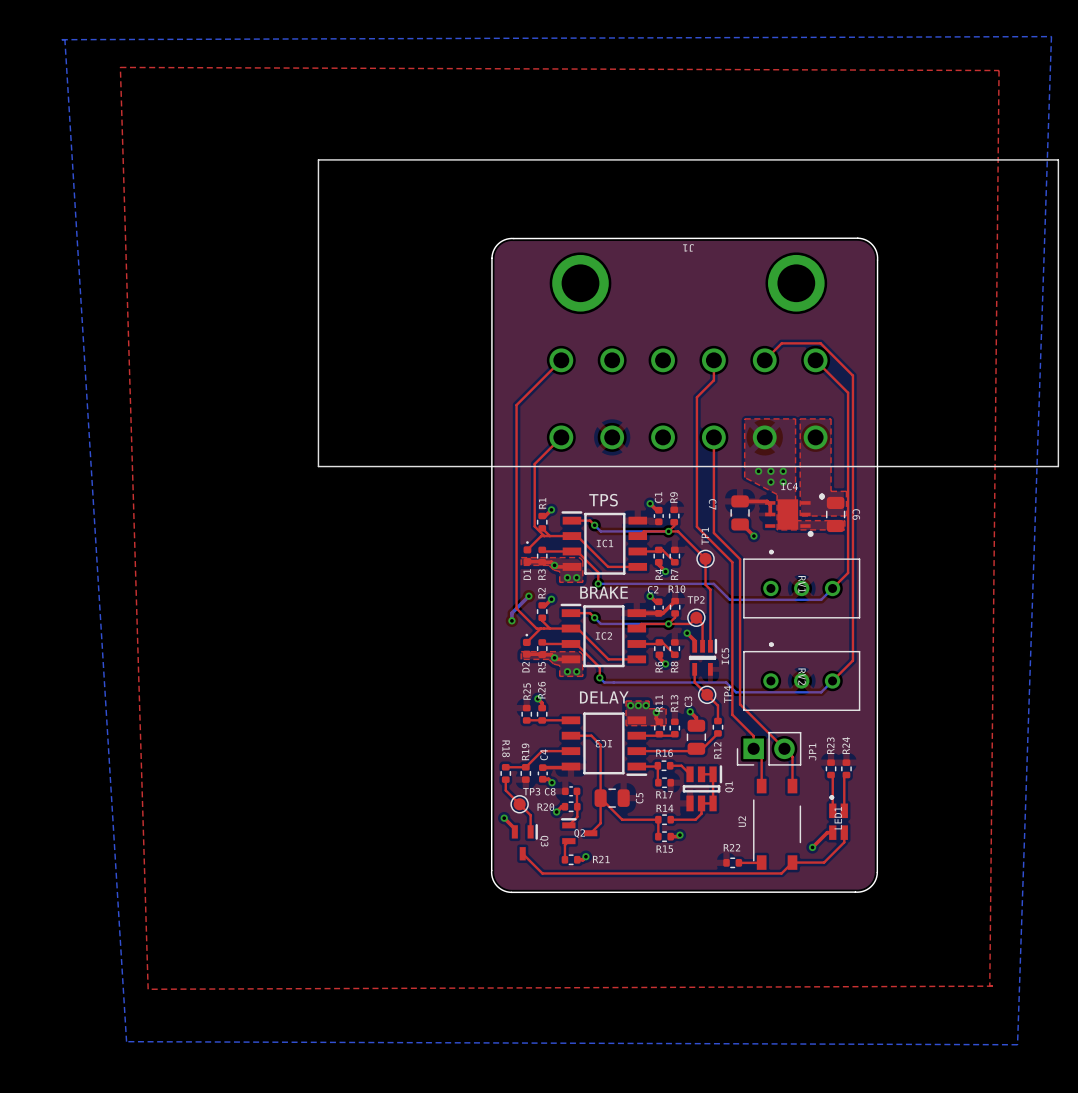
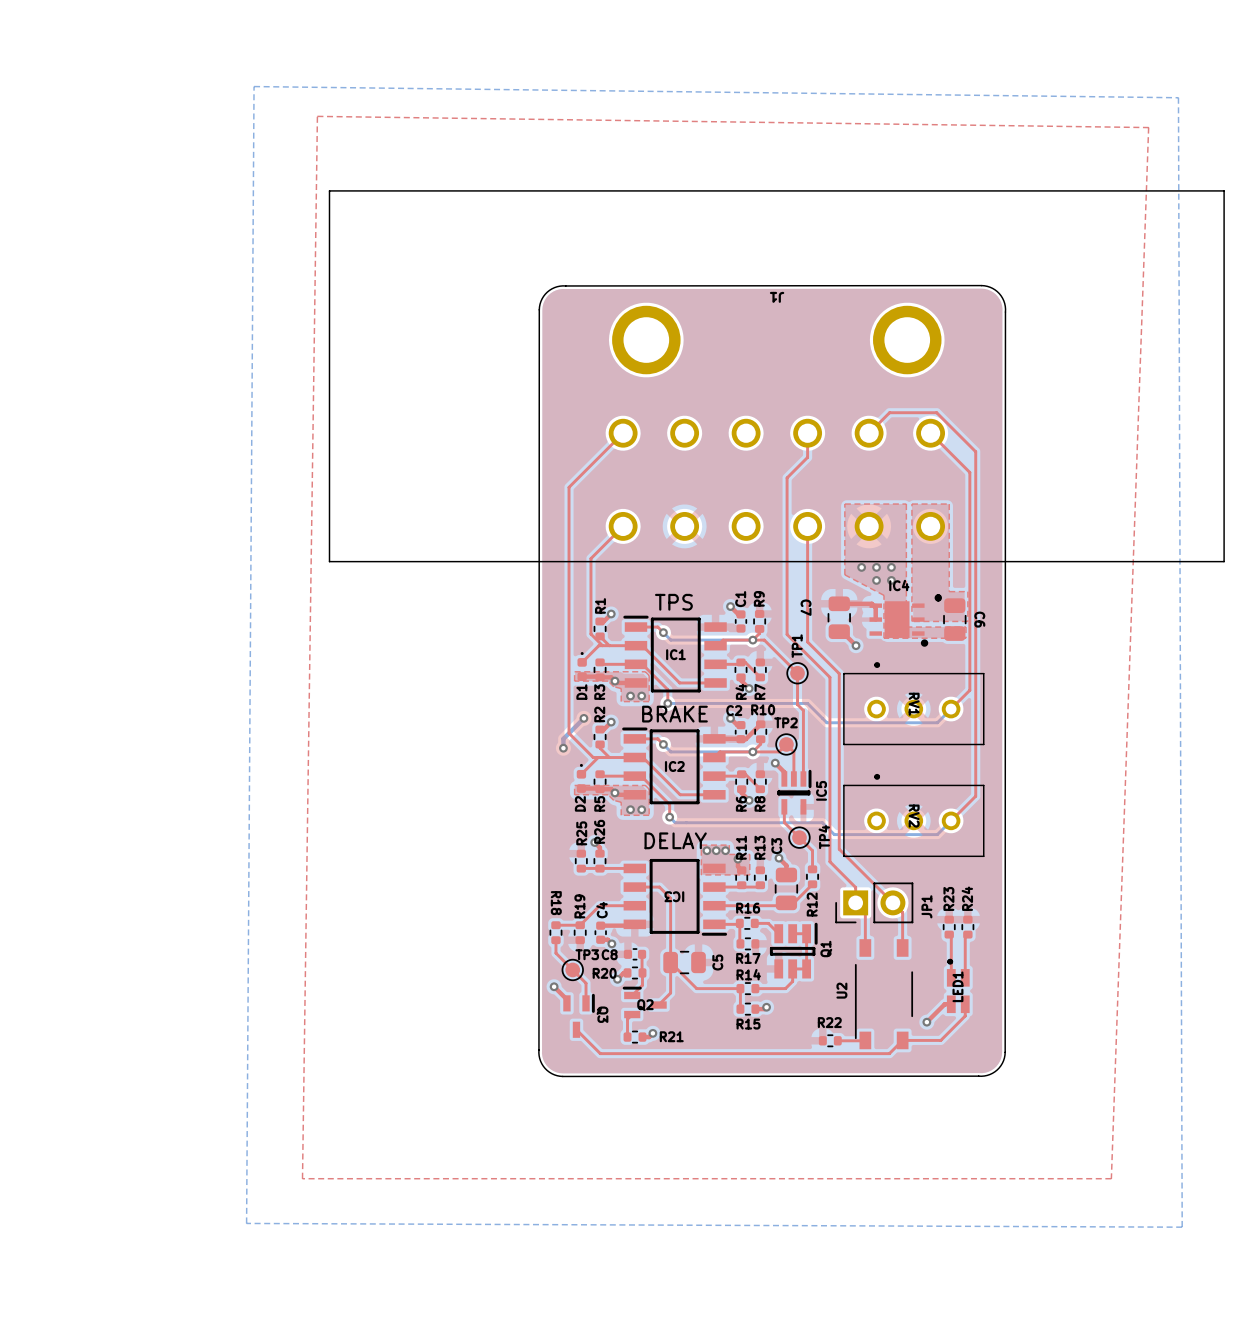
bottom zone outline: (1051, 36) (61, 39) (64, 39) (126, 1041) (1017, 1044) (1051, 36) -> (254, 86) (246, 1223) (1182, 1227) (1178, 97) (254, 86)
top zone outline: (120, 67) (148, 989) (992, 986) (989, 986) (999, 70) (120, 67) -> (317, 116) (302, 1178) (1111, 1178) (1148, 127) (317, 116)

